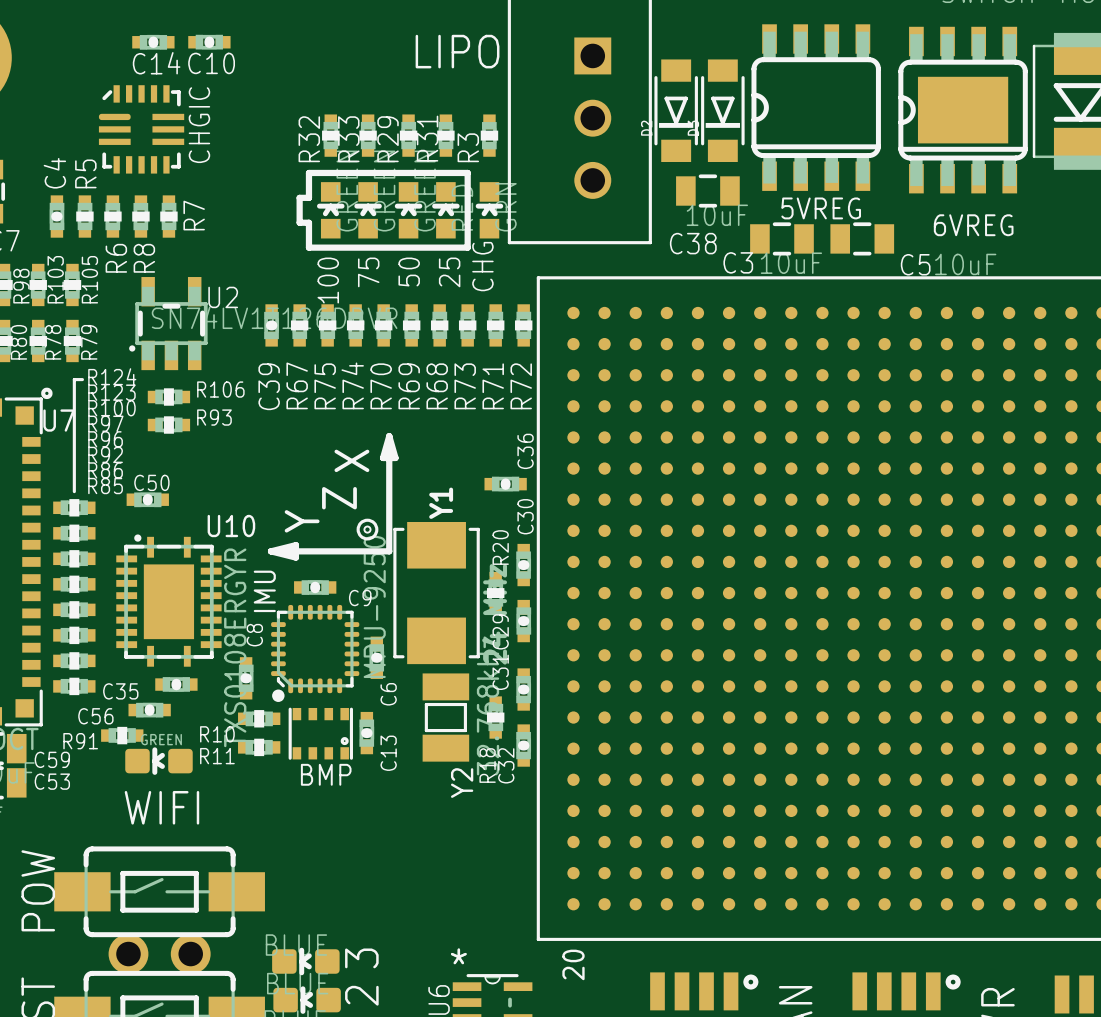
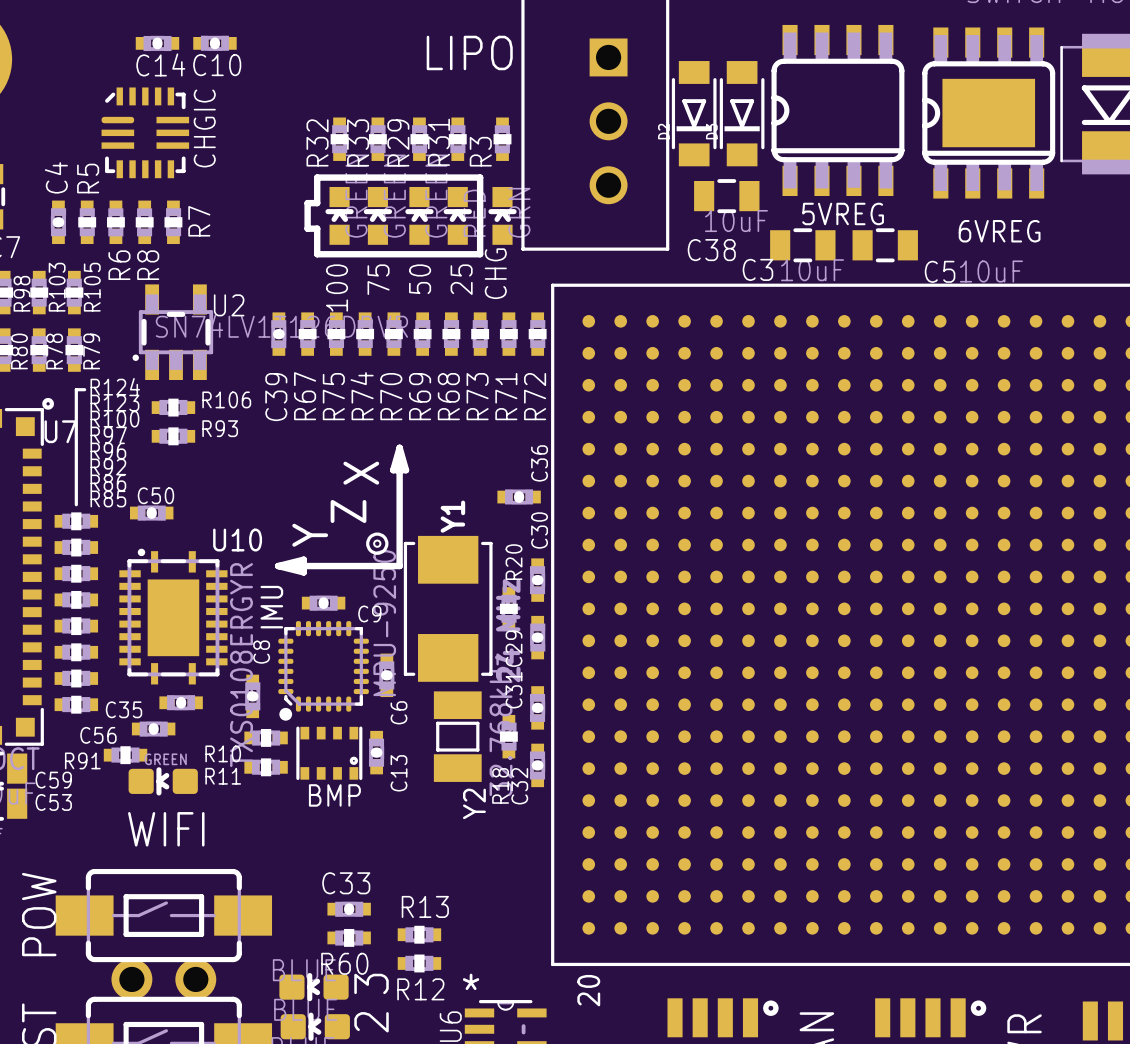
C33: none -> (349, 909)
R13: none -> (419, 934)
R60: none -> (349, 937)
R12: none -> (419, 963)

